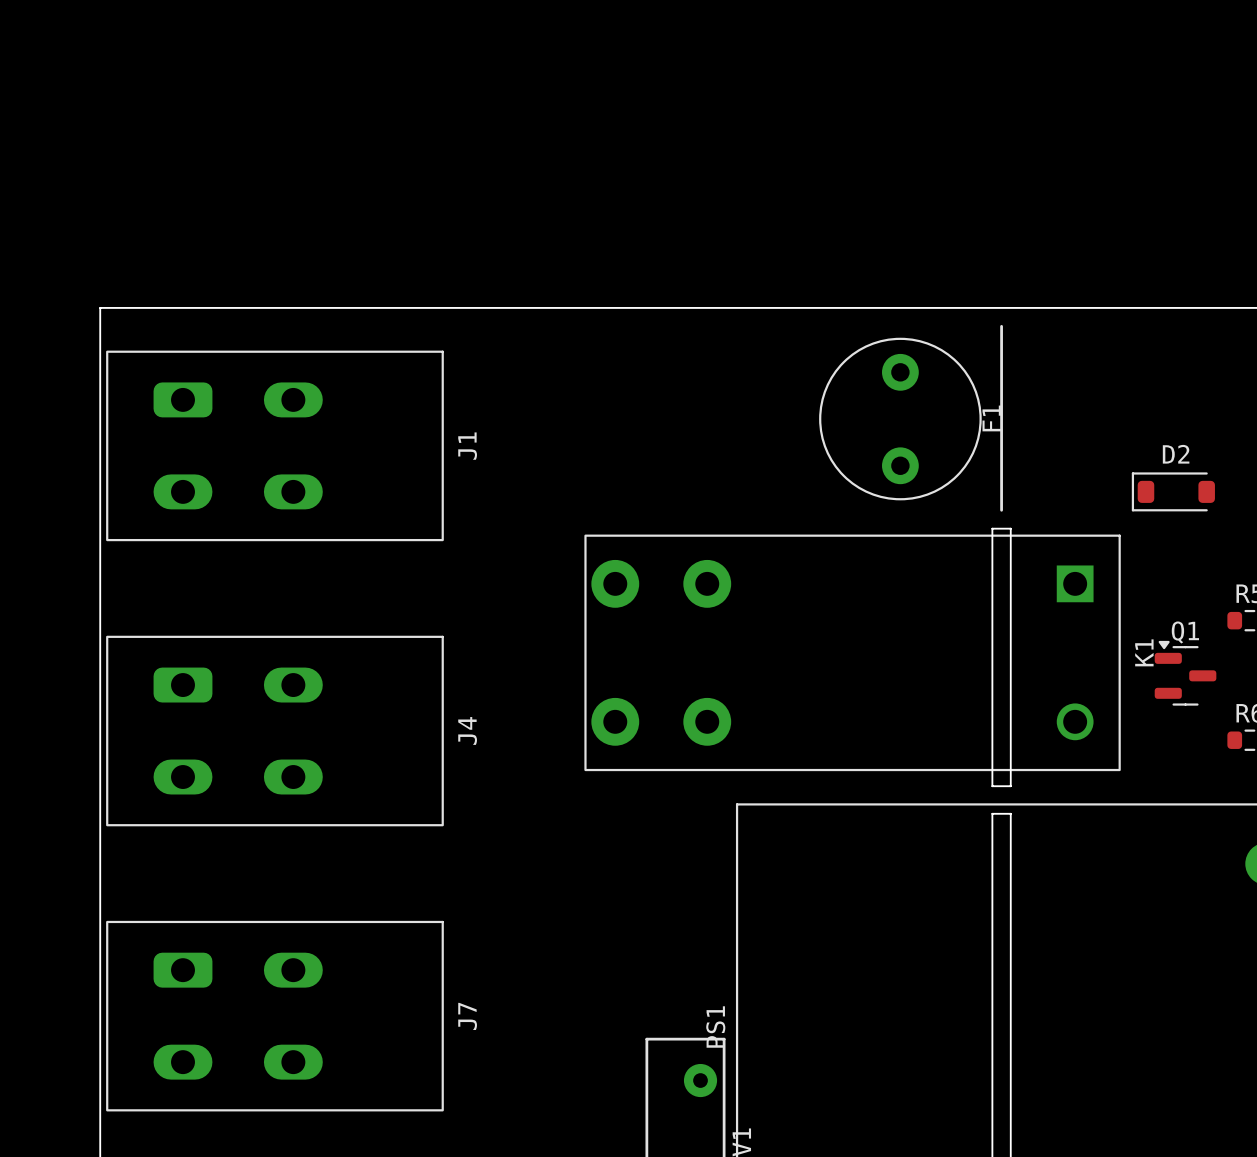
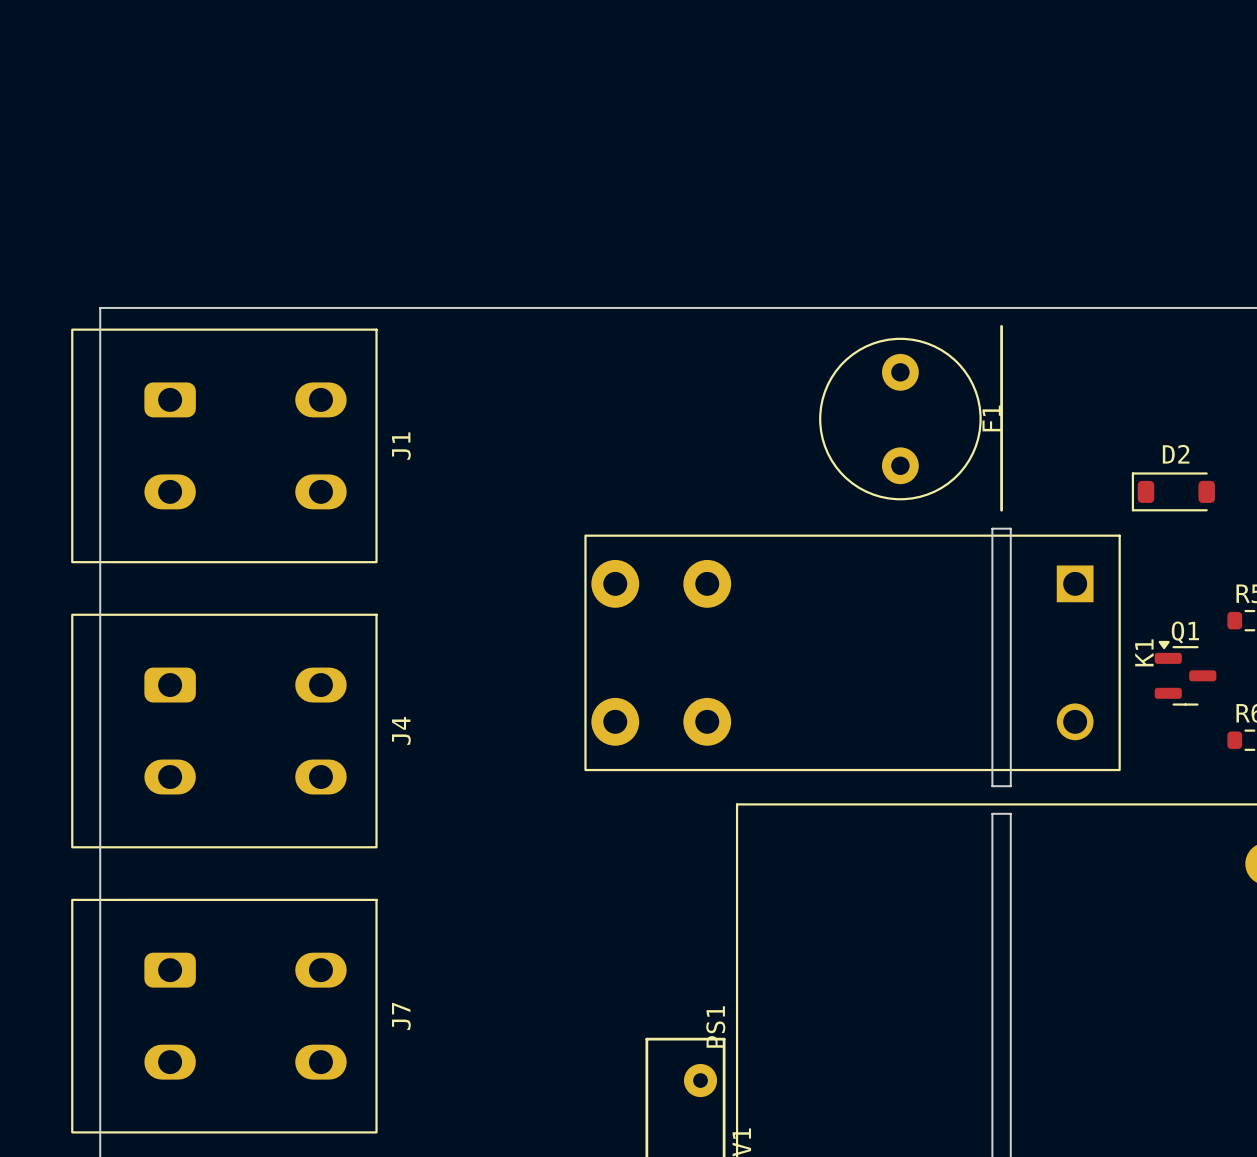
J1 footprint: [106, 350, 444, 542] -> [71, 328, 378, 564]
J4 footprint: [106, 635, 444, 827] -> [71, 613, 378, 849]
J7 footprint: [106, 920, 444, 1112] -> [71, 898, 378, 1134]

